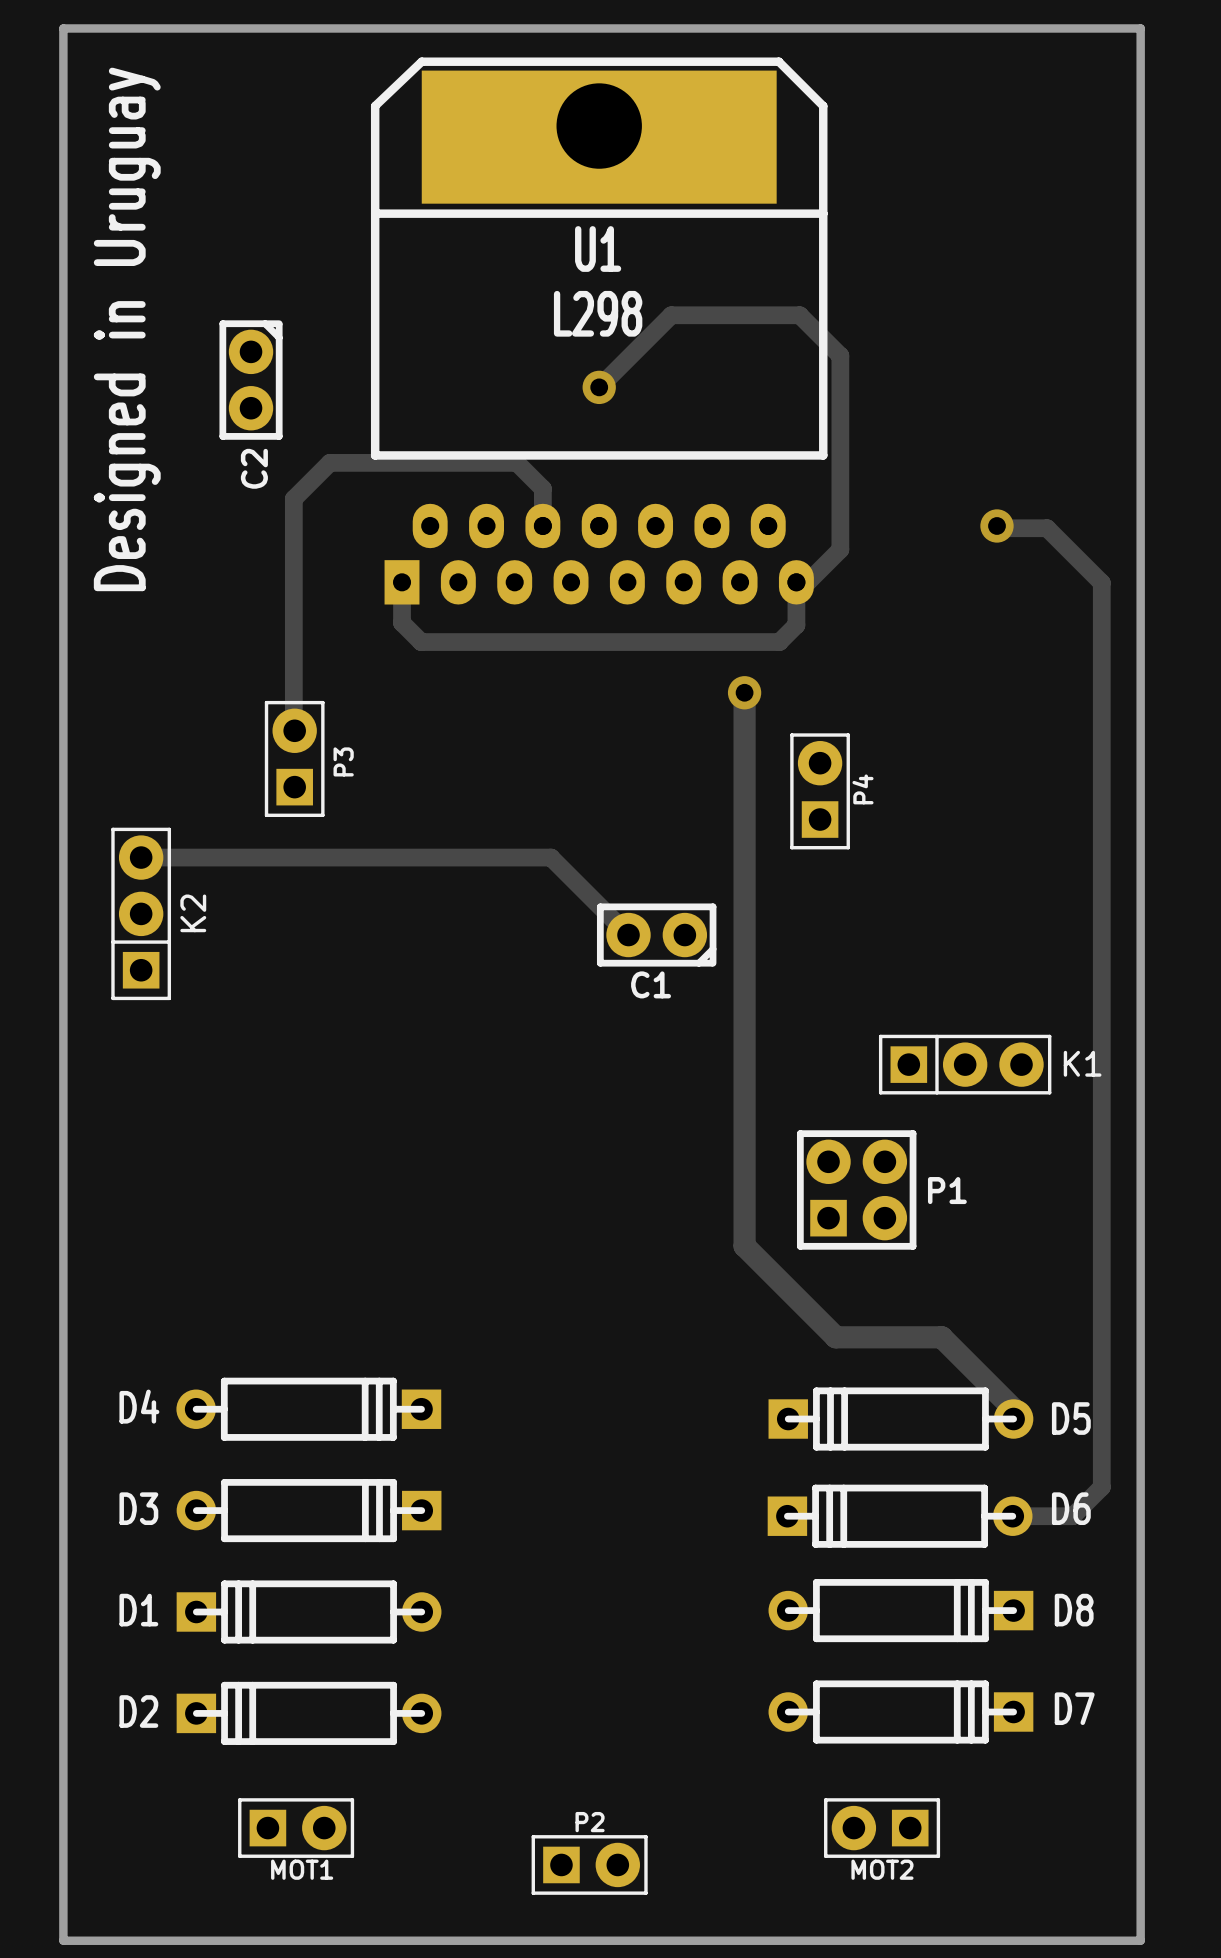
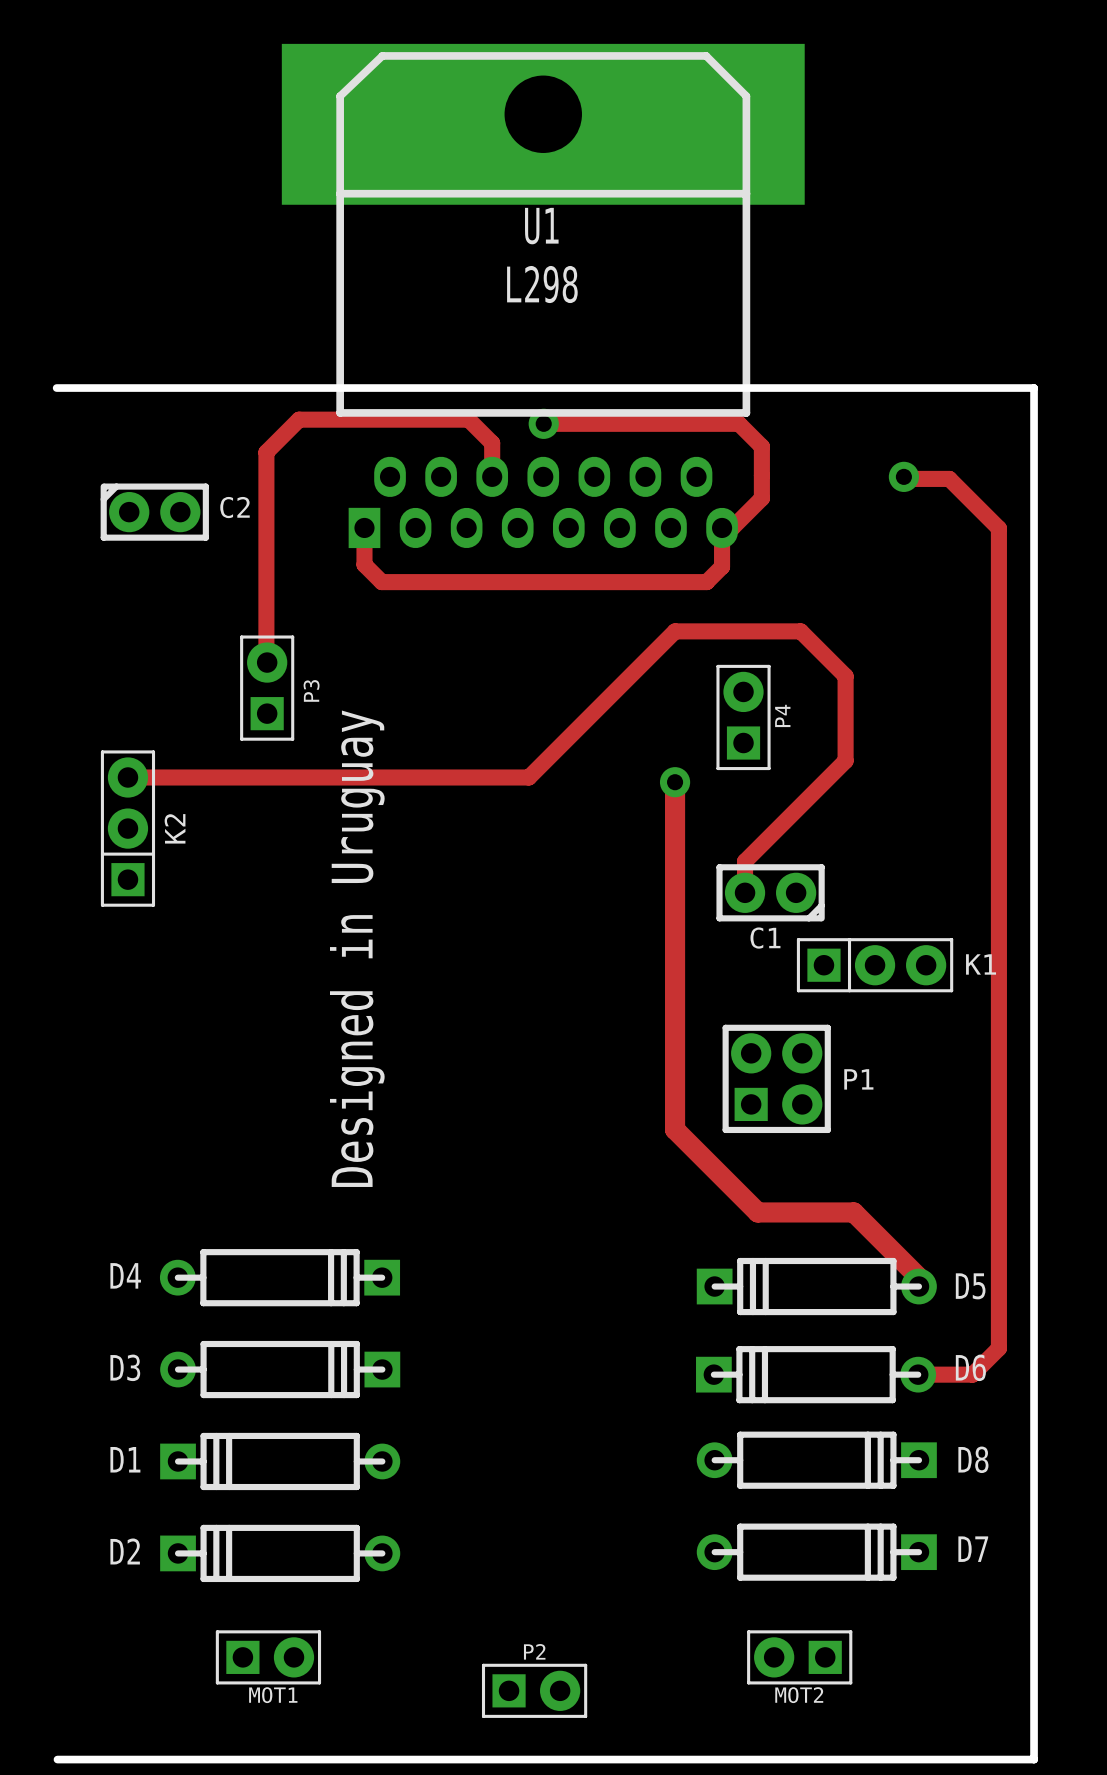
U1 footprint: [370, 57, 828, 605] -> [281, 43, 805, 549]
text: Designed in Uruguay (127, 329) -> none
C2 rotation: 0° (251, 380) -> 90° counterclockwise (154, 512)
C2 position: (251, 380) -> (154, 512)
track: (599, 387) (671, 315) (799, 315) (840, 355) (840, 492) -> (543, 423) (739, 423) (761, 446)
via position: (599, 387) -> (543, 423)
track: (744, 692) (744, 862) -> none
via: (744, 692) -> none
track: (551, 857) (628, 935) -> (499, 777) (528, 777) (675, 631) (800, 631) (845, 676) (845, 760) (745, 861) (745, 892)
via: none -> (675, 782)
C1 position: (656, 935) -> (770, 892)
text: none -> Designed in Uruguay (357, 948)
board edge: (63, 1940) (63, 28) (1140, 28) (1140, 1940) -> (56, 388) (1034, 388) (1034, 1759)

